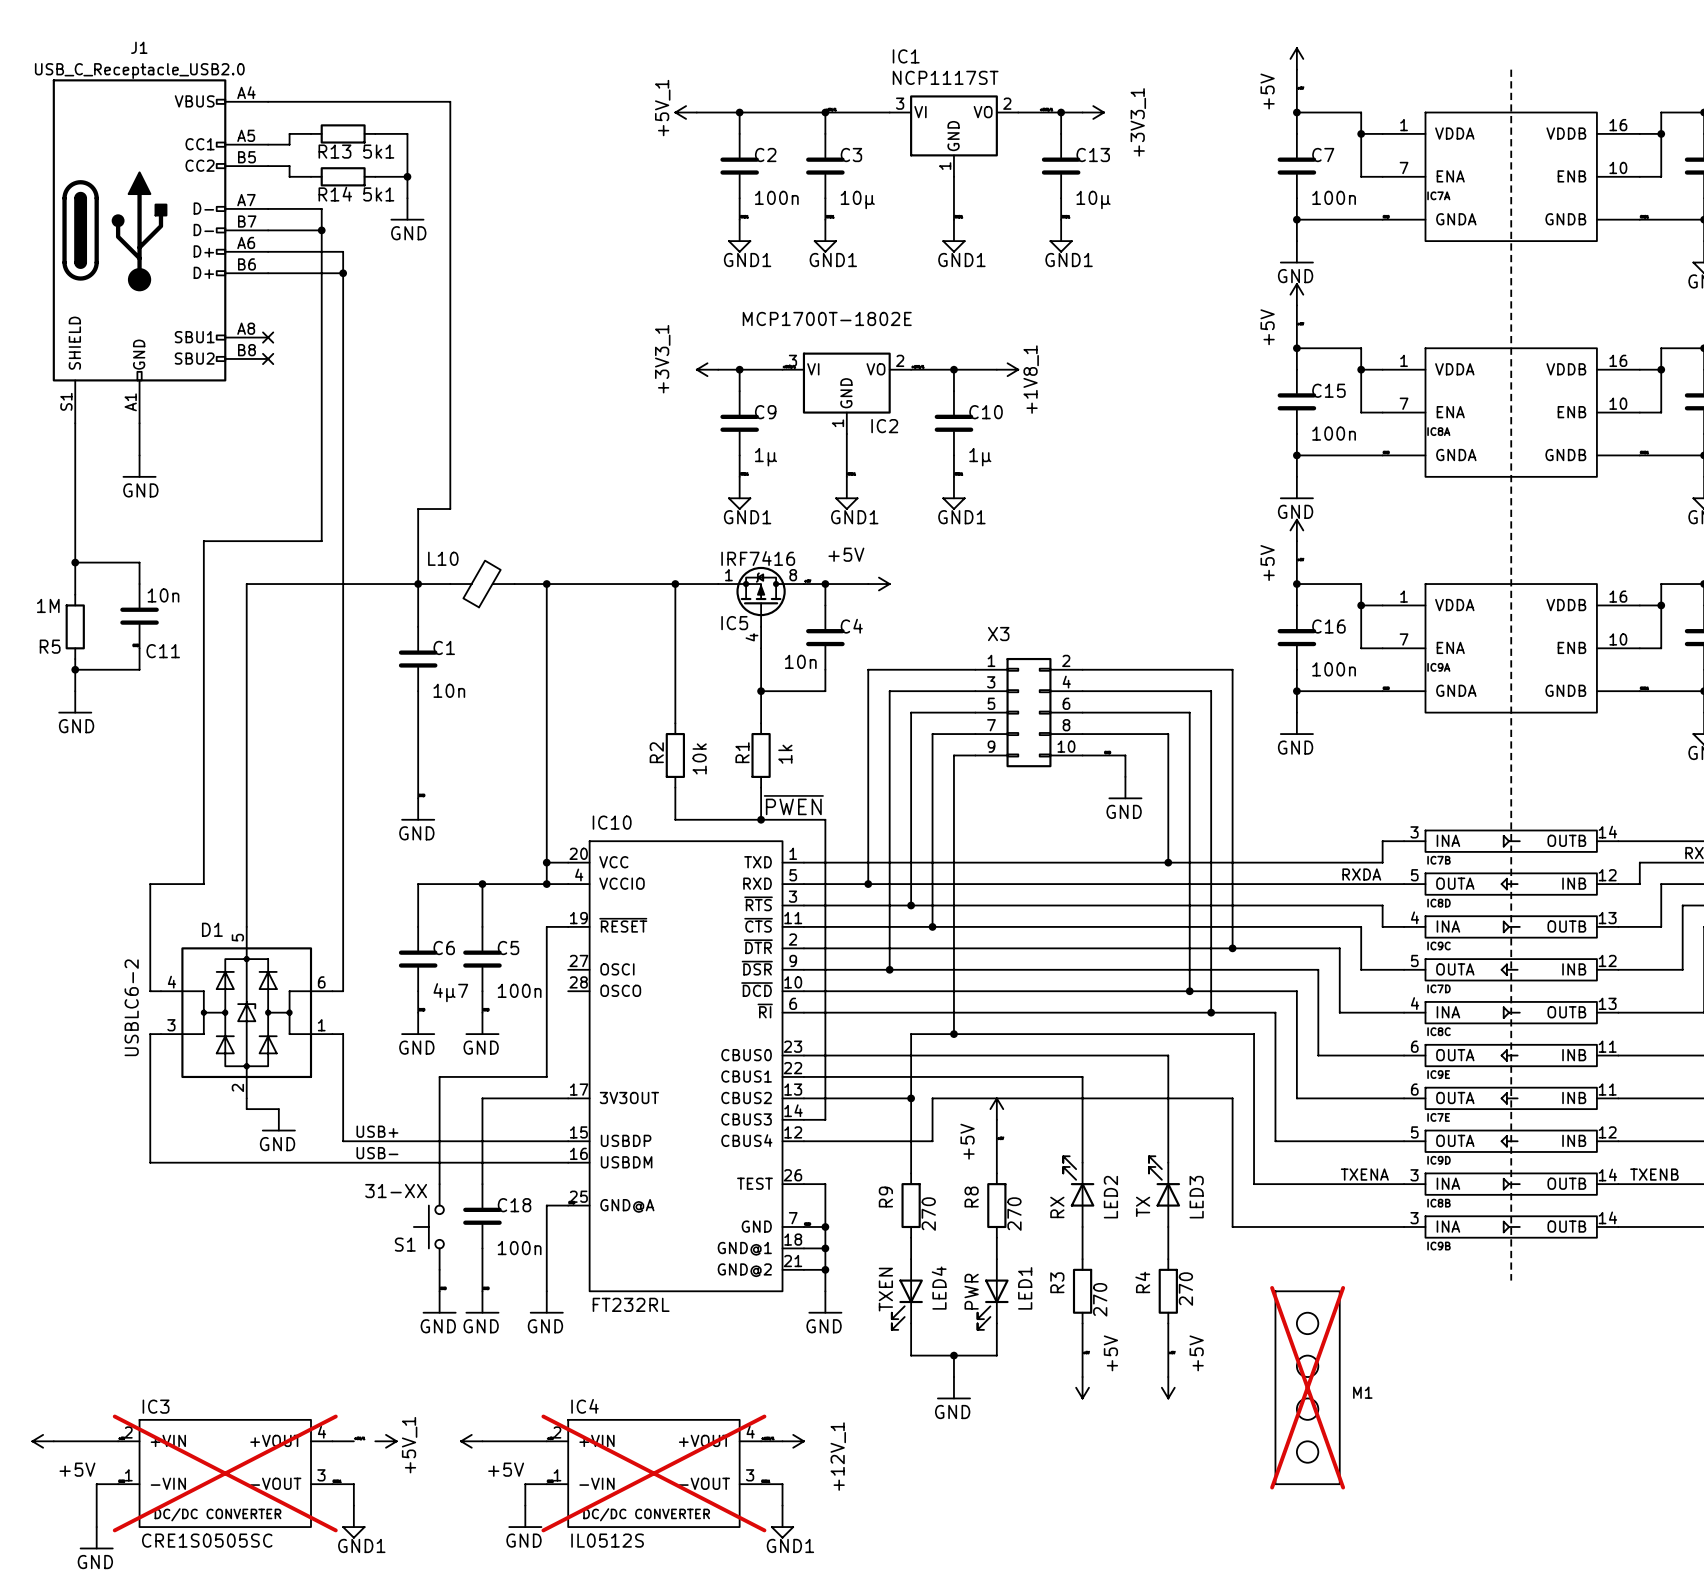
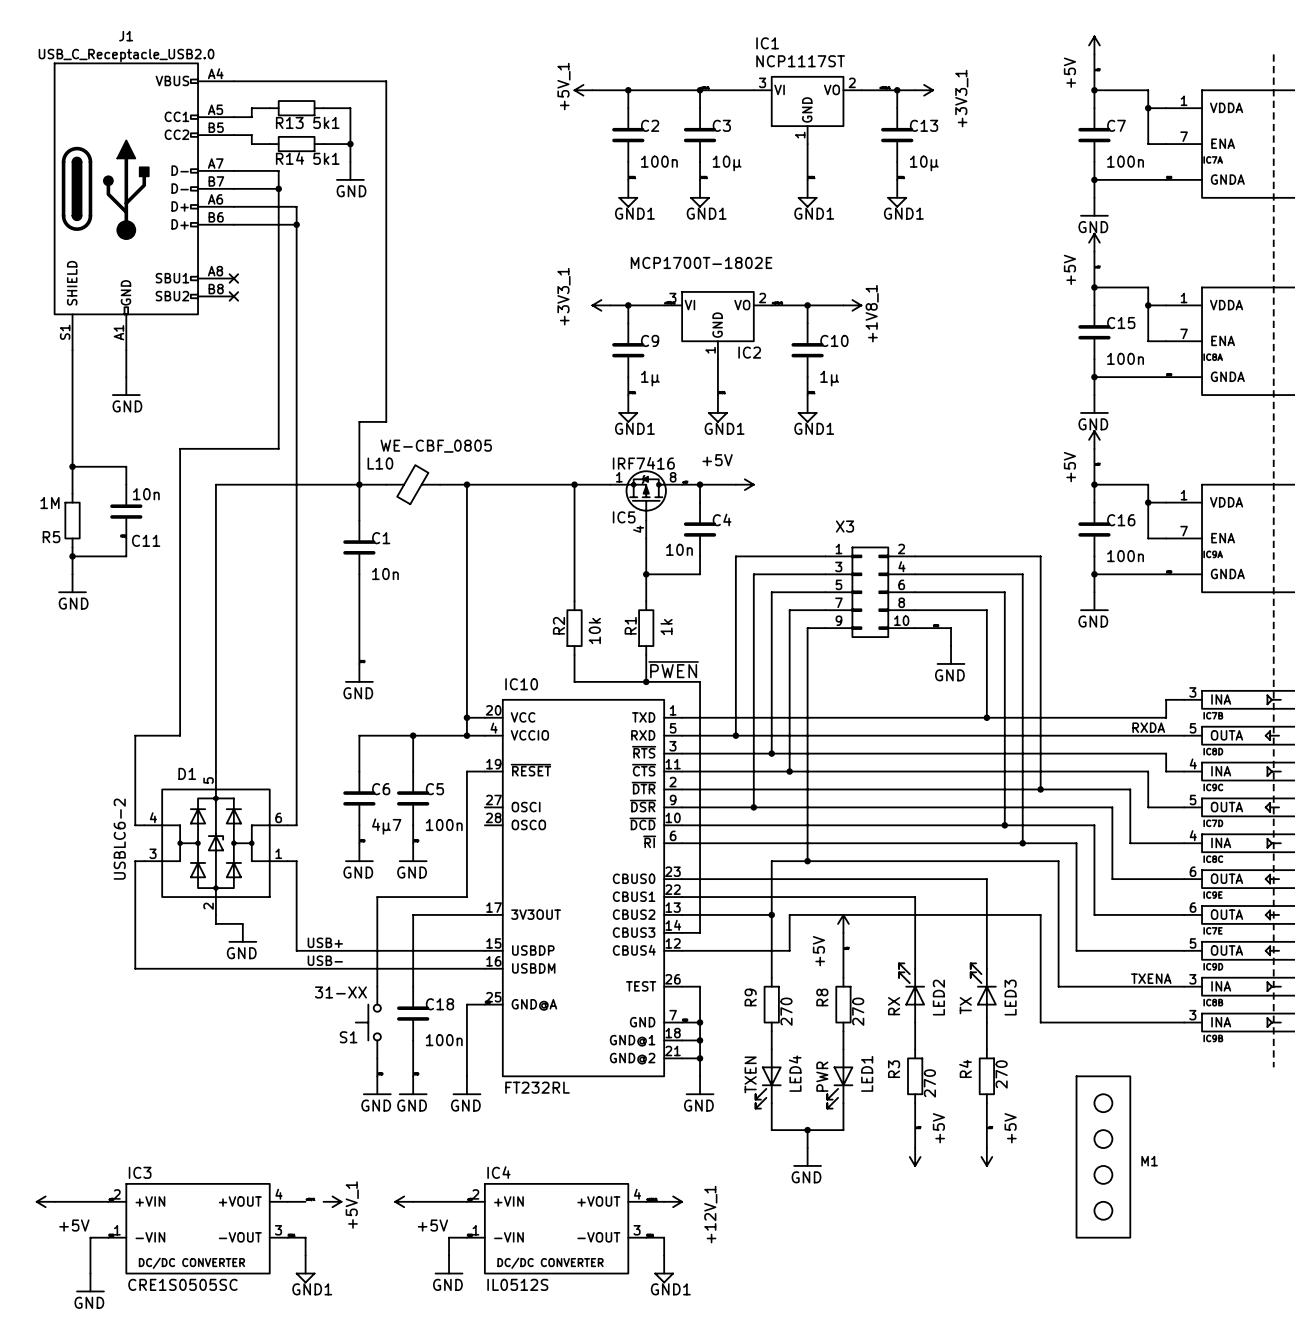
L10 value: none -> WE-CBF_0805 (436, 446)
M1 do-not-place cross: (1307, 1387) -> none
IC3 do-not-place cross: (225, 1473) -> none
IC4 do-not-place cross: (653, 1473) -> none

